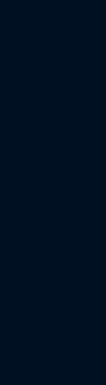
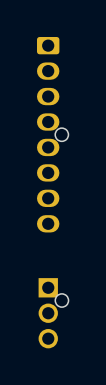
part: none -> (52, 134)
part: none -> (53, 313)

